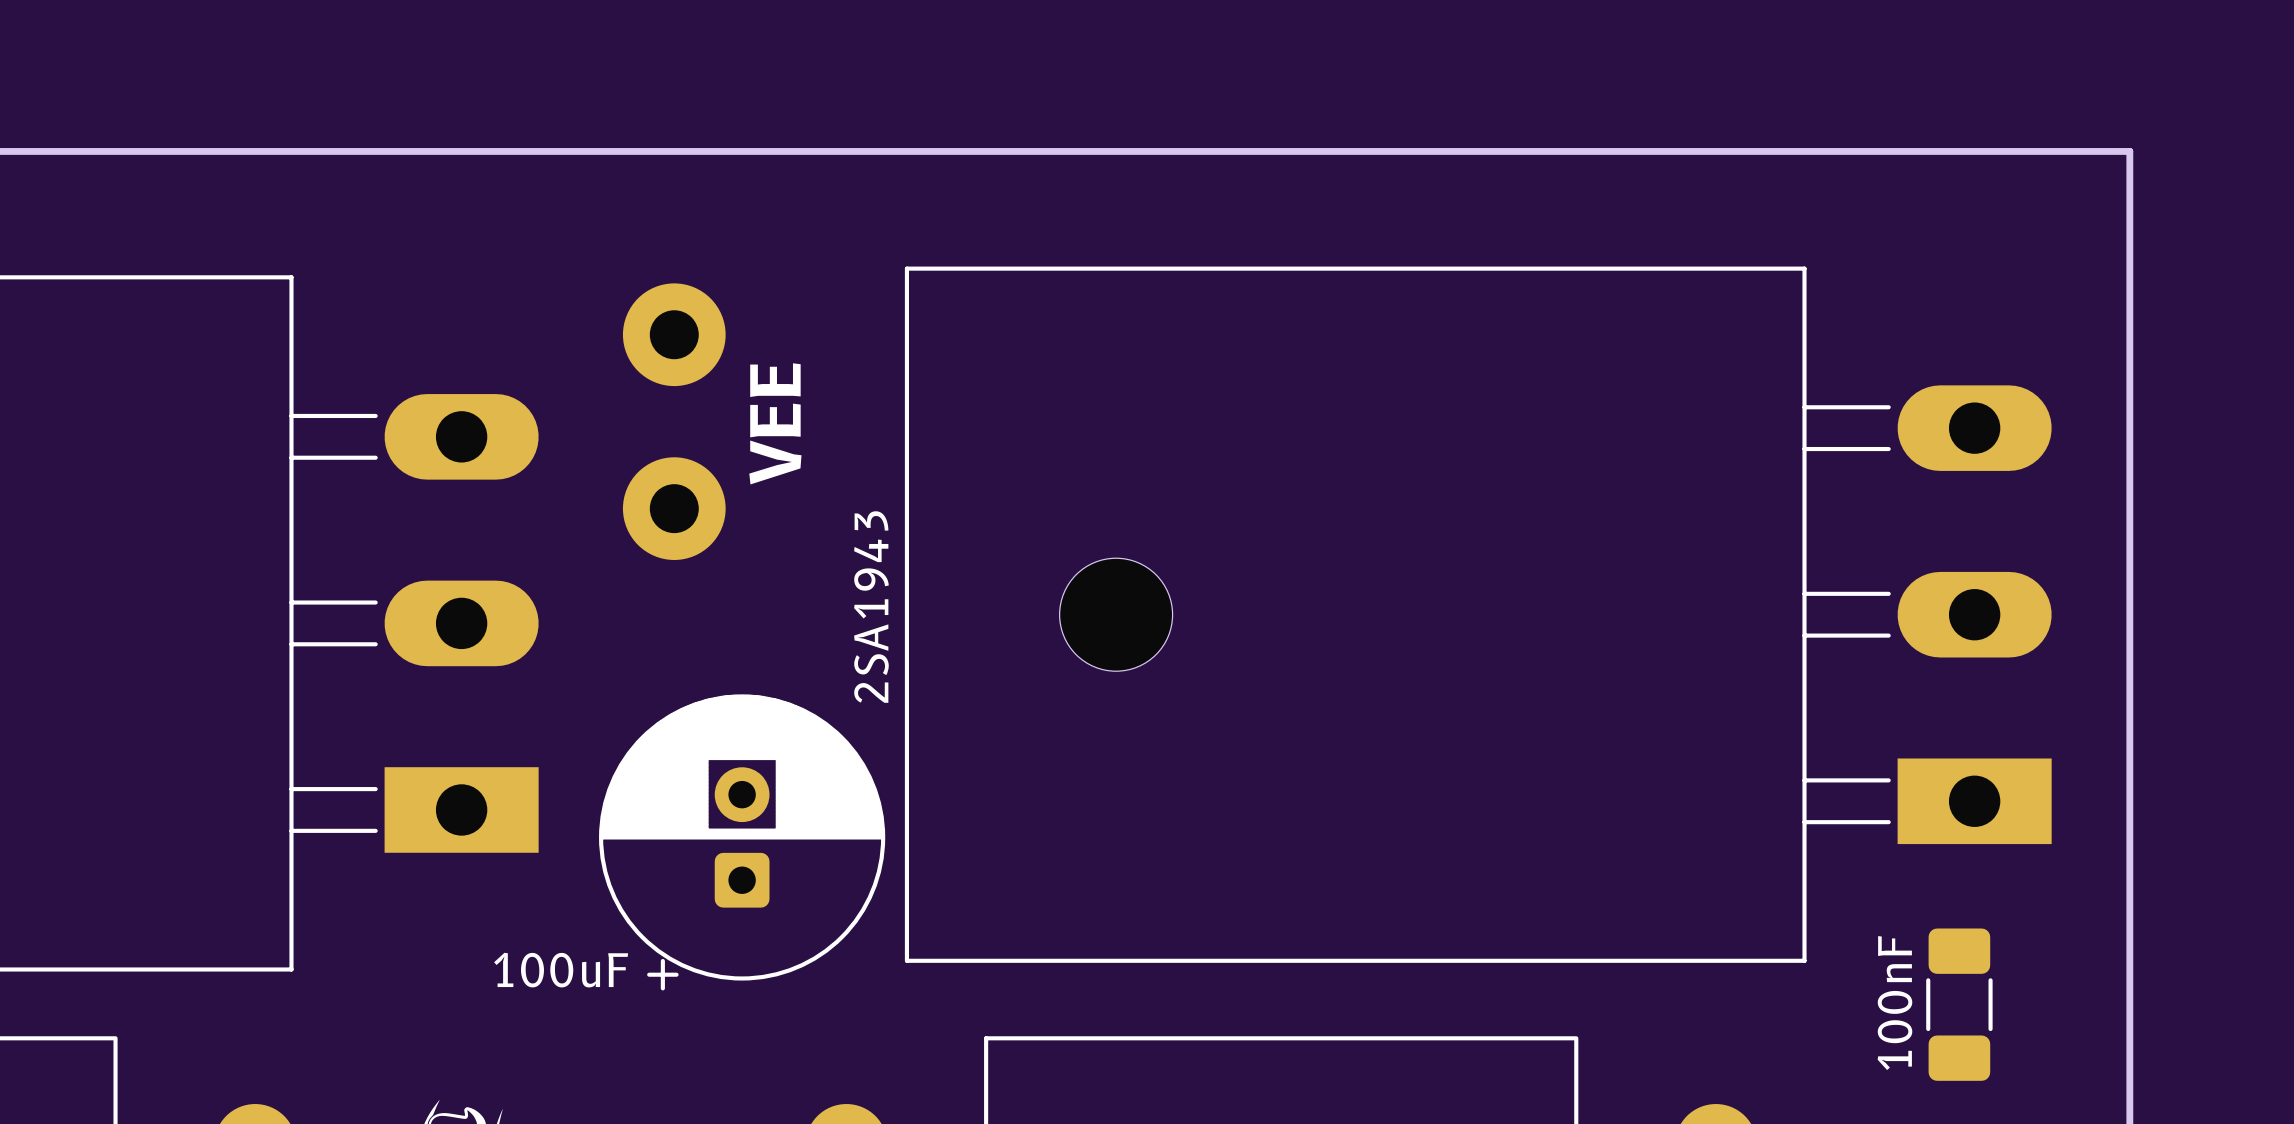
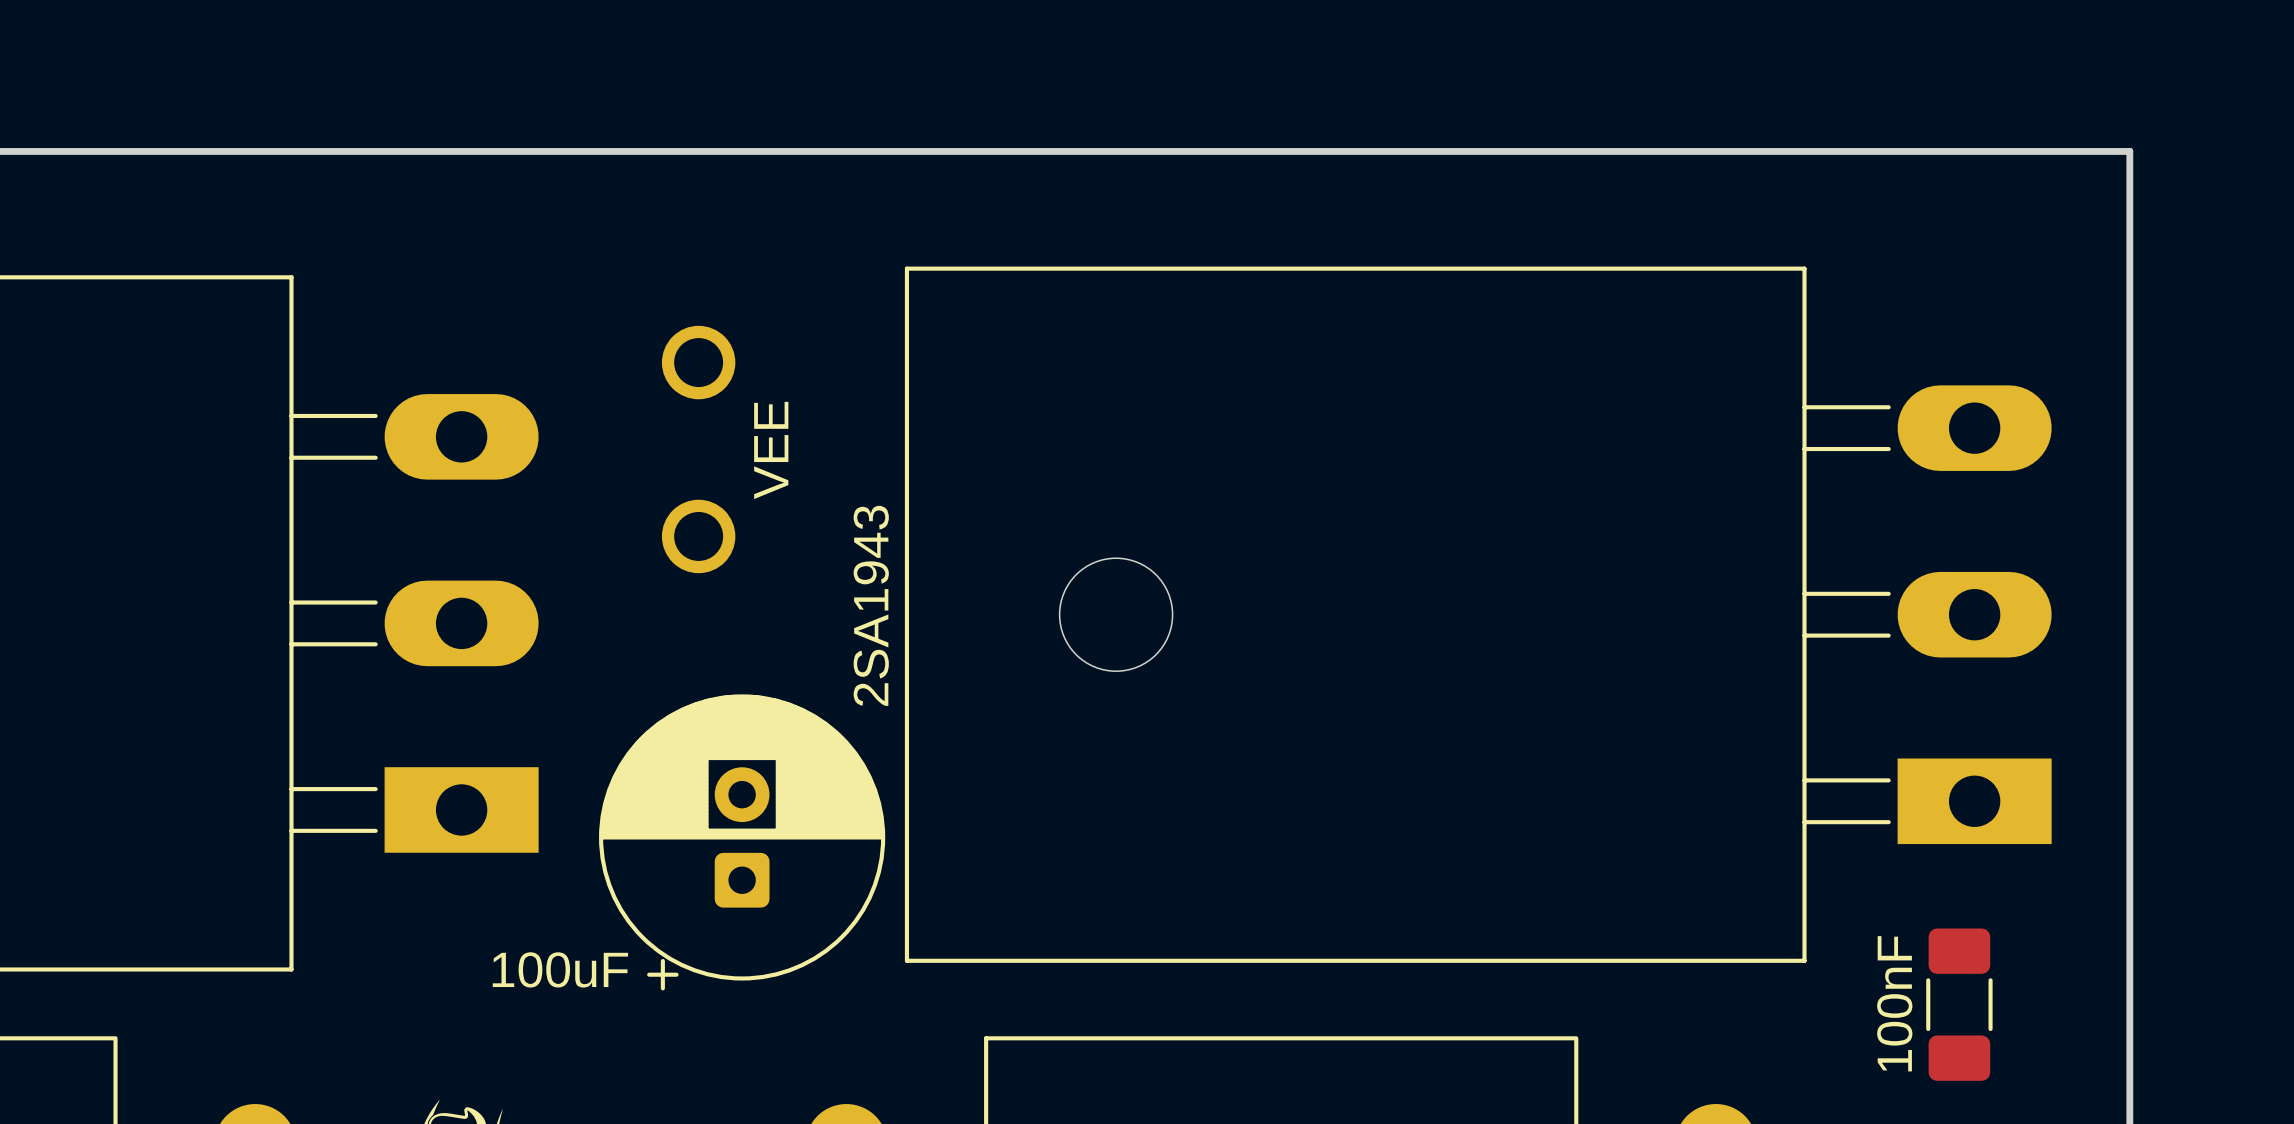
part: VEE (674, 421) -> none
part: none -> VEE (698, 449)

